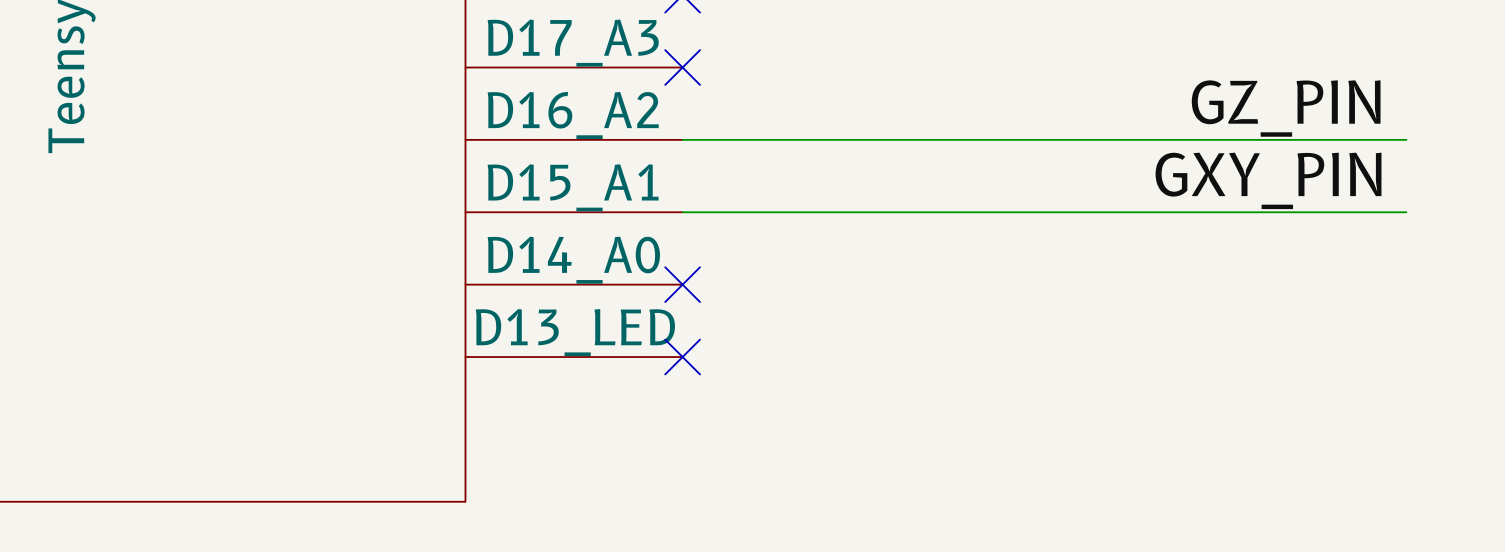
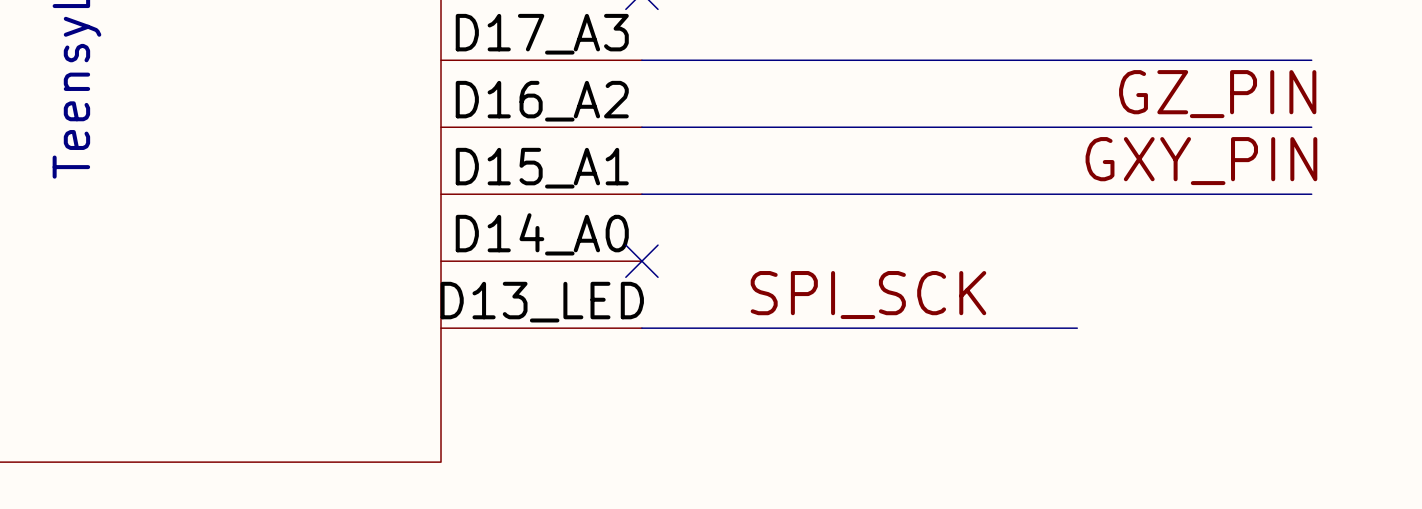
wire: none -> (641, 60) (1311, 60)
no-connect mark: (682, 67) -> none
label: none -> SPI_SCK (868, 295)
wire: none -> (641, 328) (1077, 328)
no-connect mark: (682, 357) -> none

